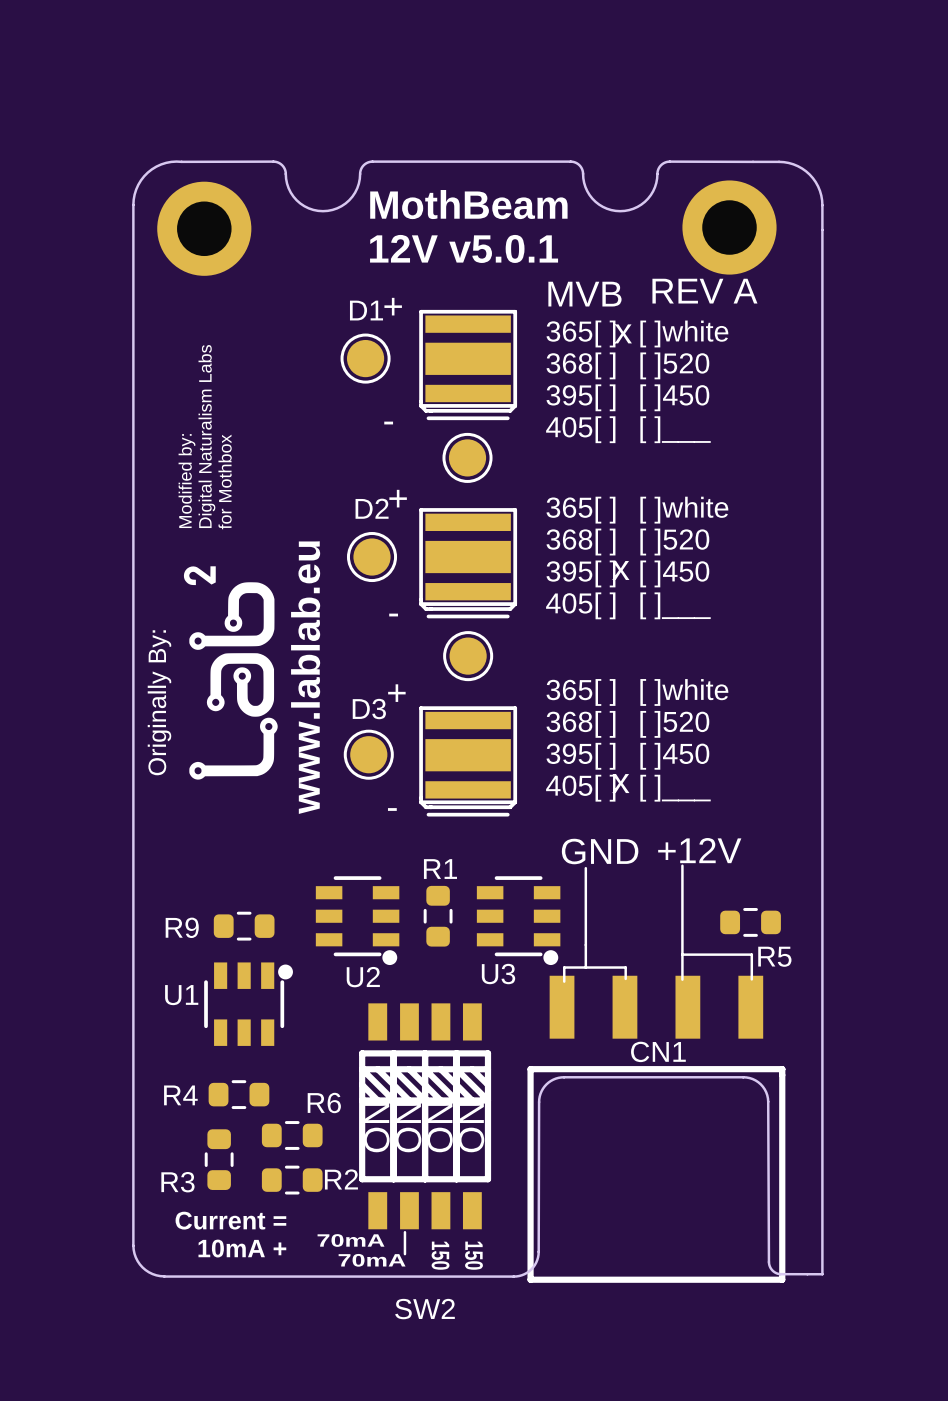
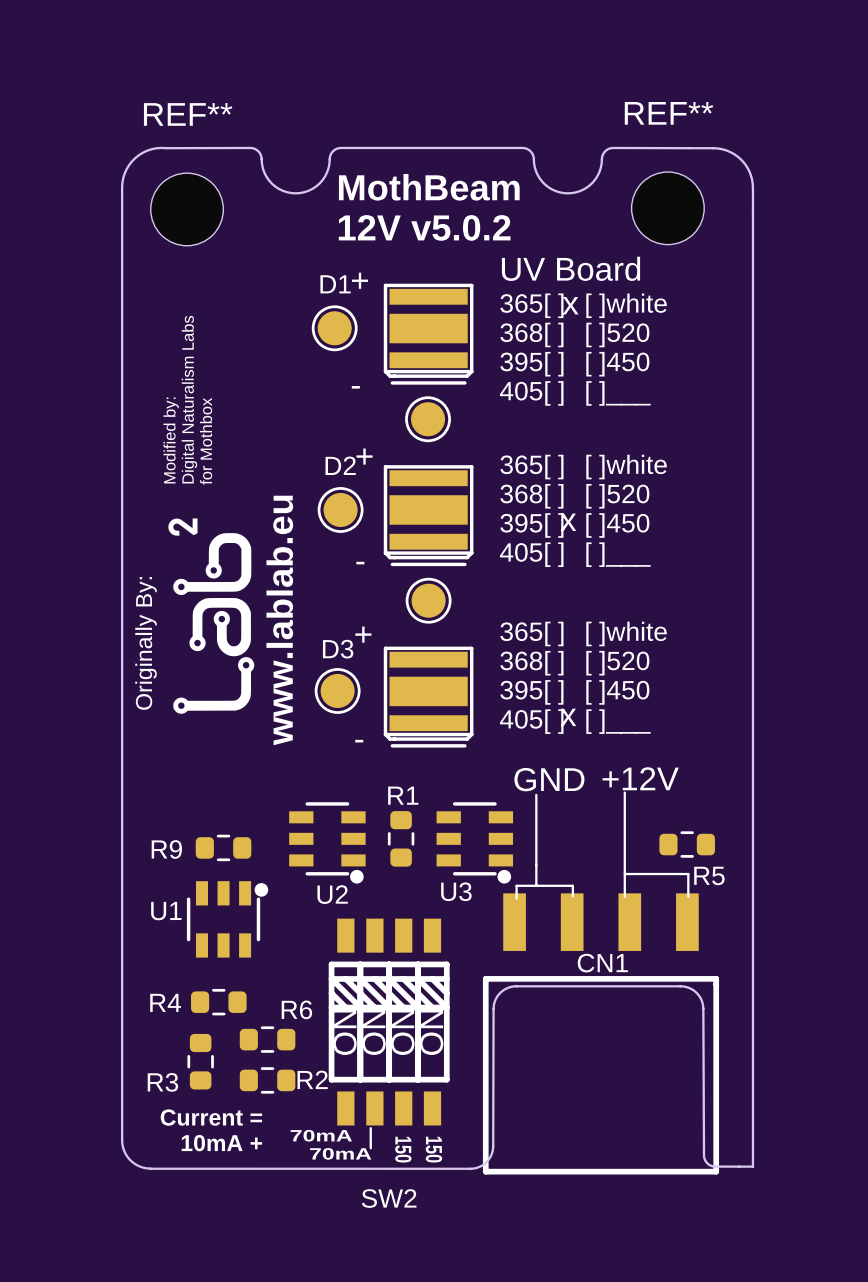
part: (729, 227) -> none
REF**: none -> (667, 208)
part: (204, 228) -> none
REF**: none -> (187, 209)
text: 12V v5.0.1 (464, 248) -> 12V v5.0.2 (424, 227)
text: REV A (704, 291) -> none
text: MVB (584, 294) -> UV Board (571, 268)

